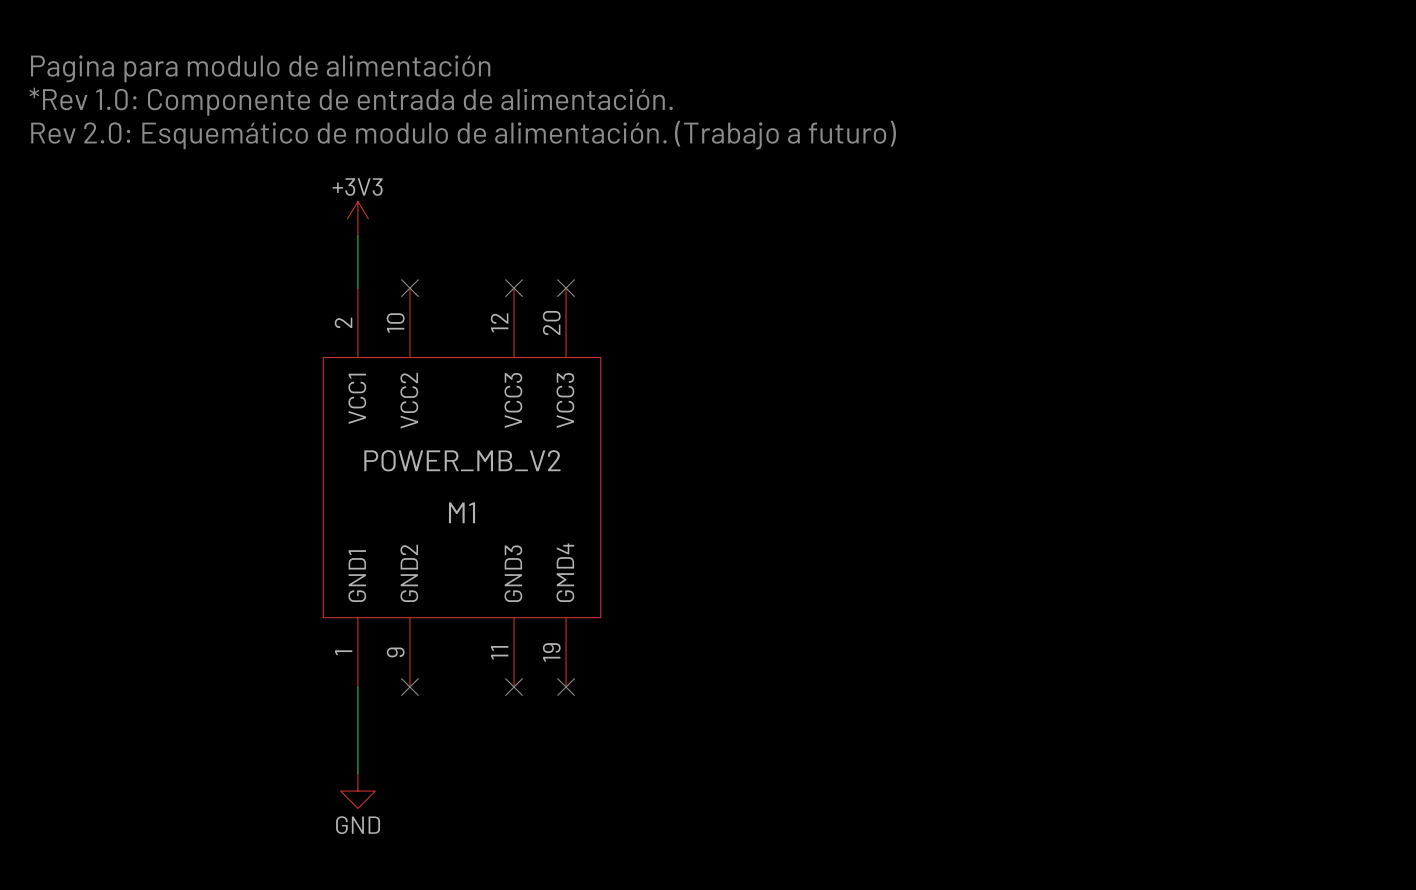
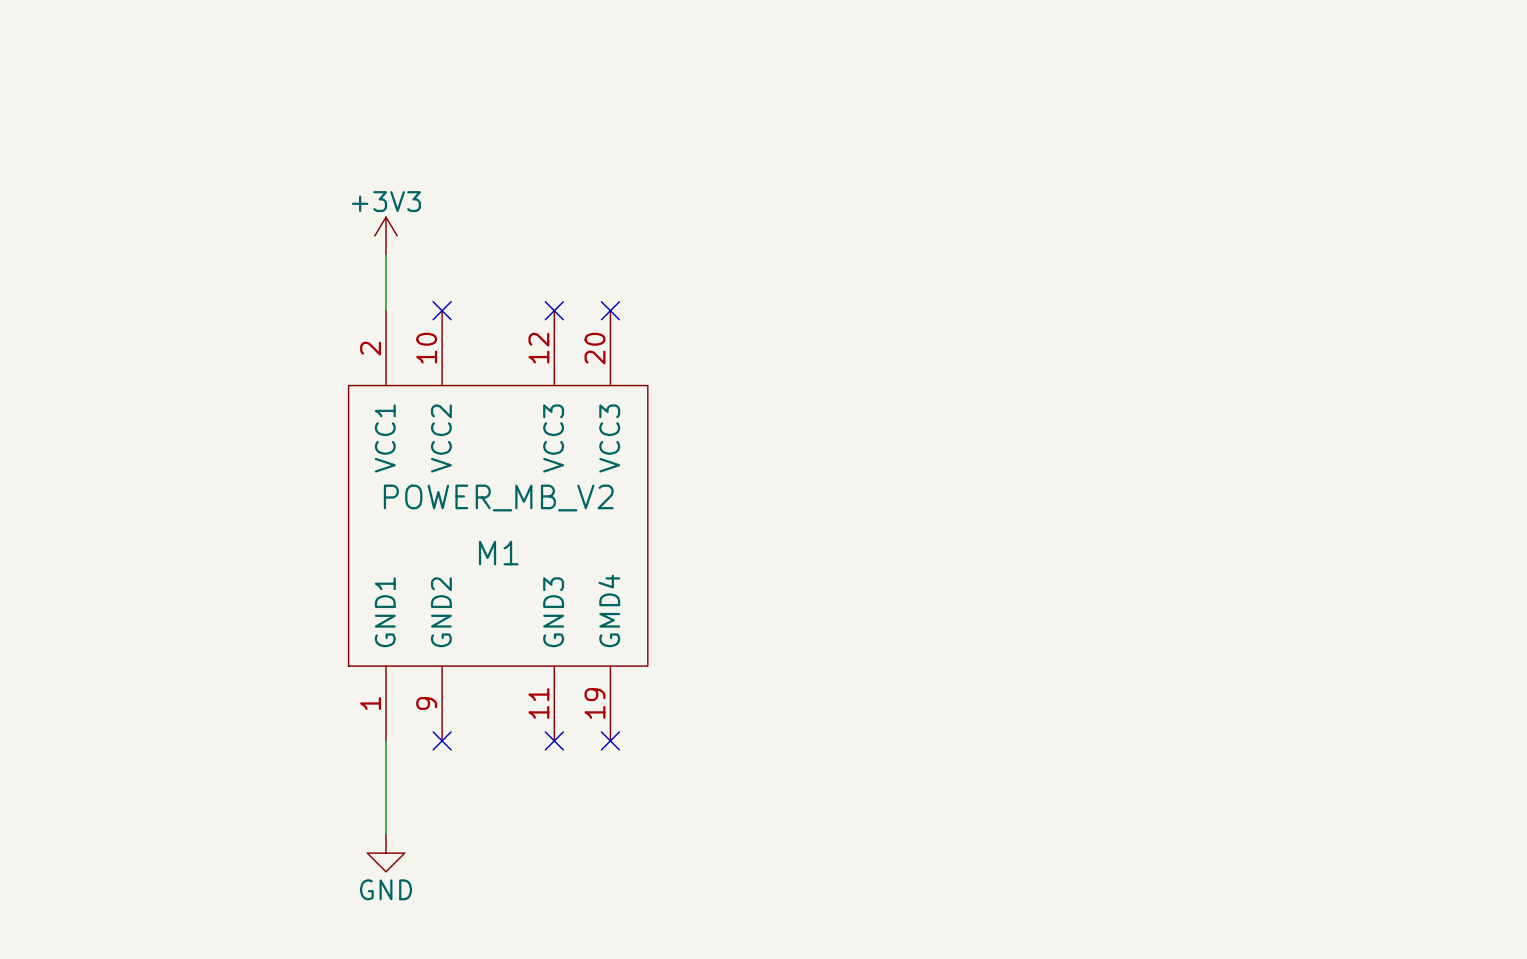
text: Pagina para modulo de alimentación (260, 68) -> none
text: *Rev 1.0: Componente de entrada de alimentación. (351, 101) -> none
text: Rev 2.0: Esquemático de modulo de alimentación. (Trabajo a futuro) (463, 135) -> none

